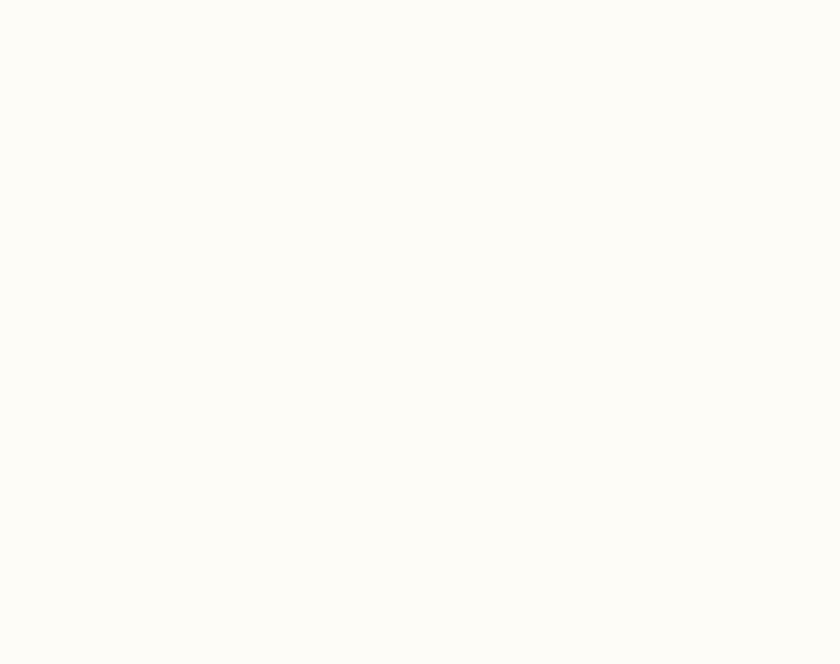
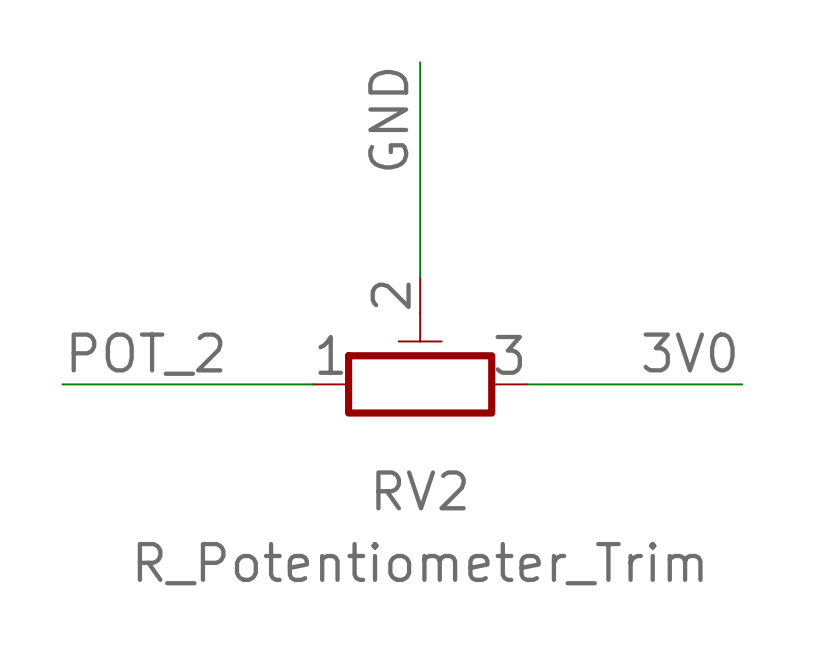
wire: none -> (420, 62) (420, 277)
label: none -> GND (388, 119)
RV2: none -> R_Potentiometer_Trim (420, 346)
label: none -> 3V0 (689, 352)
label: none -> POT_2 (146, 354)
wire: none -> (62, 384) (312, 384)
wire: none -> (527, 384) (742, 384)

